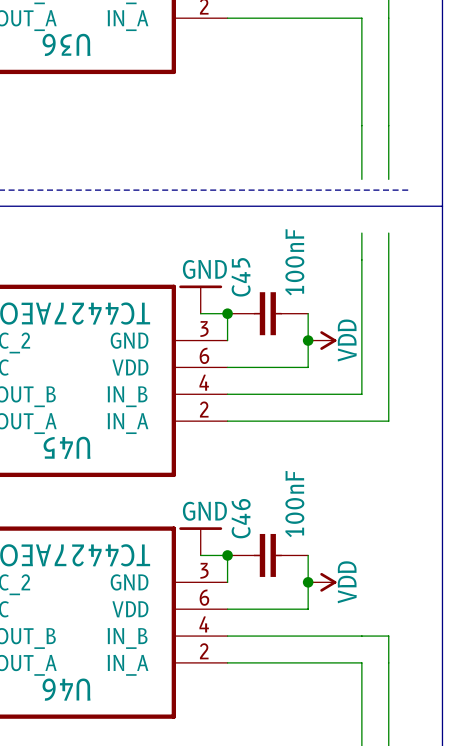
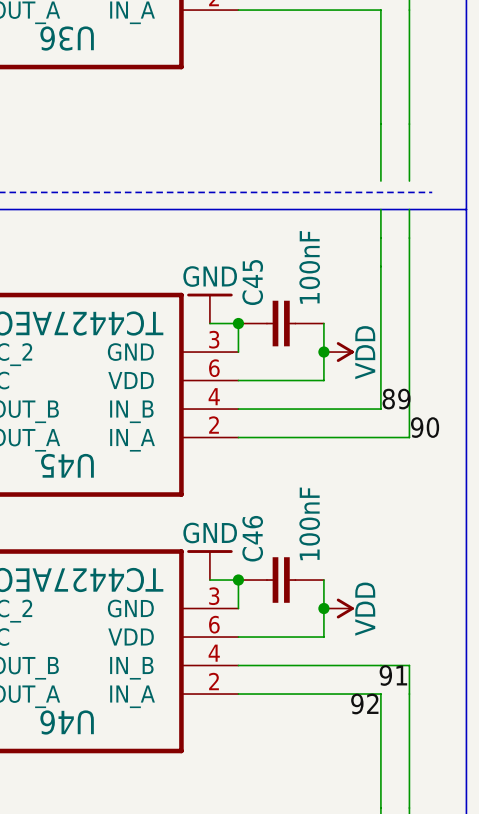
wire: none -> (380, 209) (380, 238)
wire: none -> (409, 209) (409, 238)
label: none -> 89 (396, 399)
label: none -> 90 (425, 427)
label: none -> 91 (393, 675)
label: none -> 92 (364, 704)

